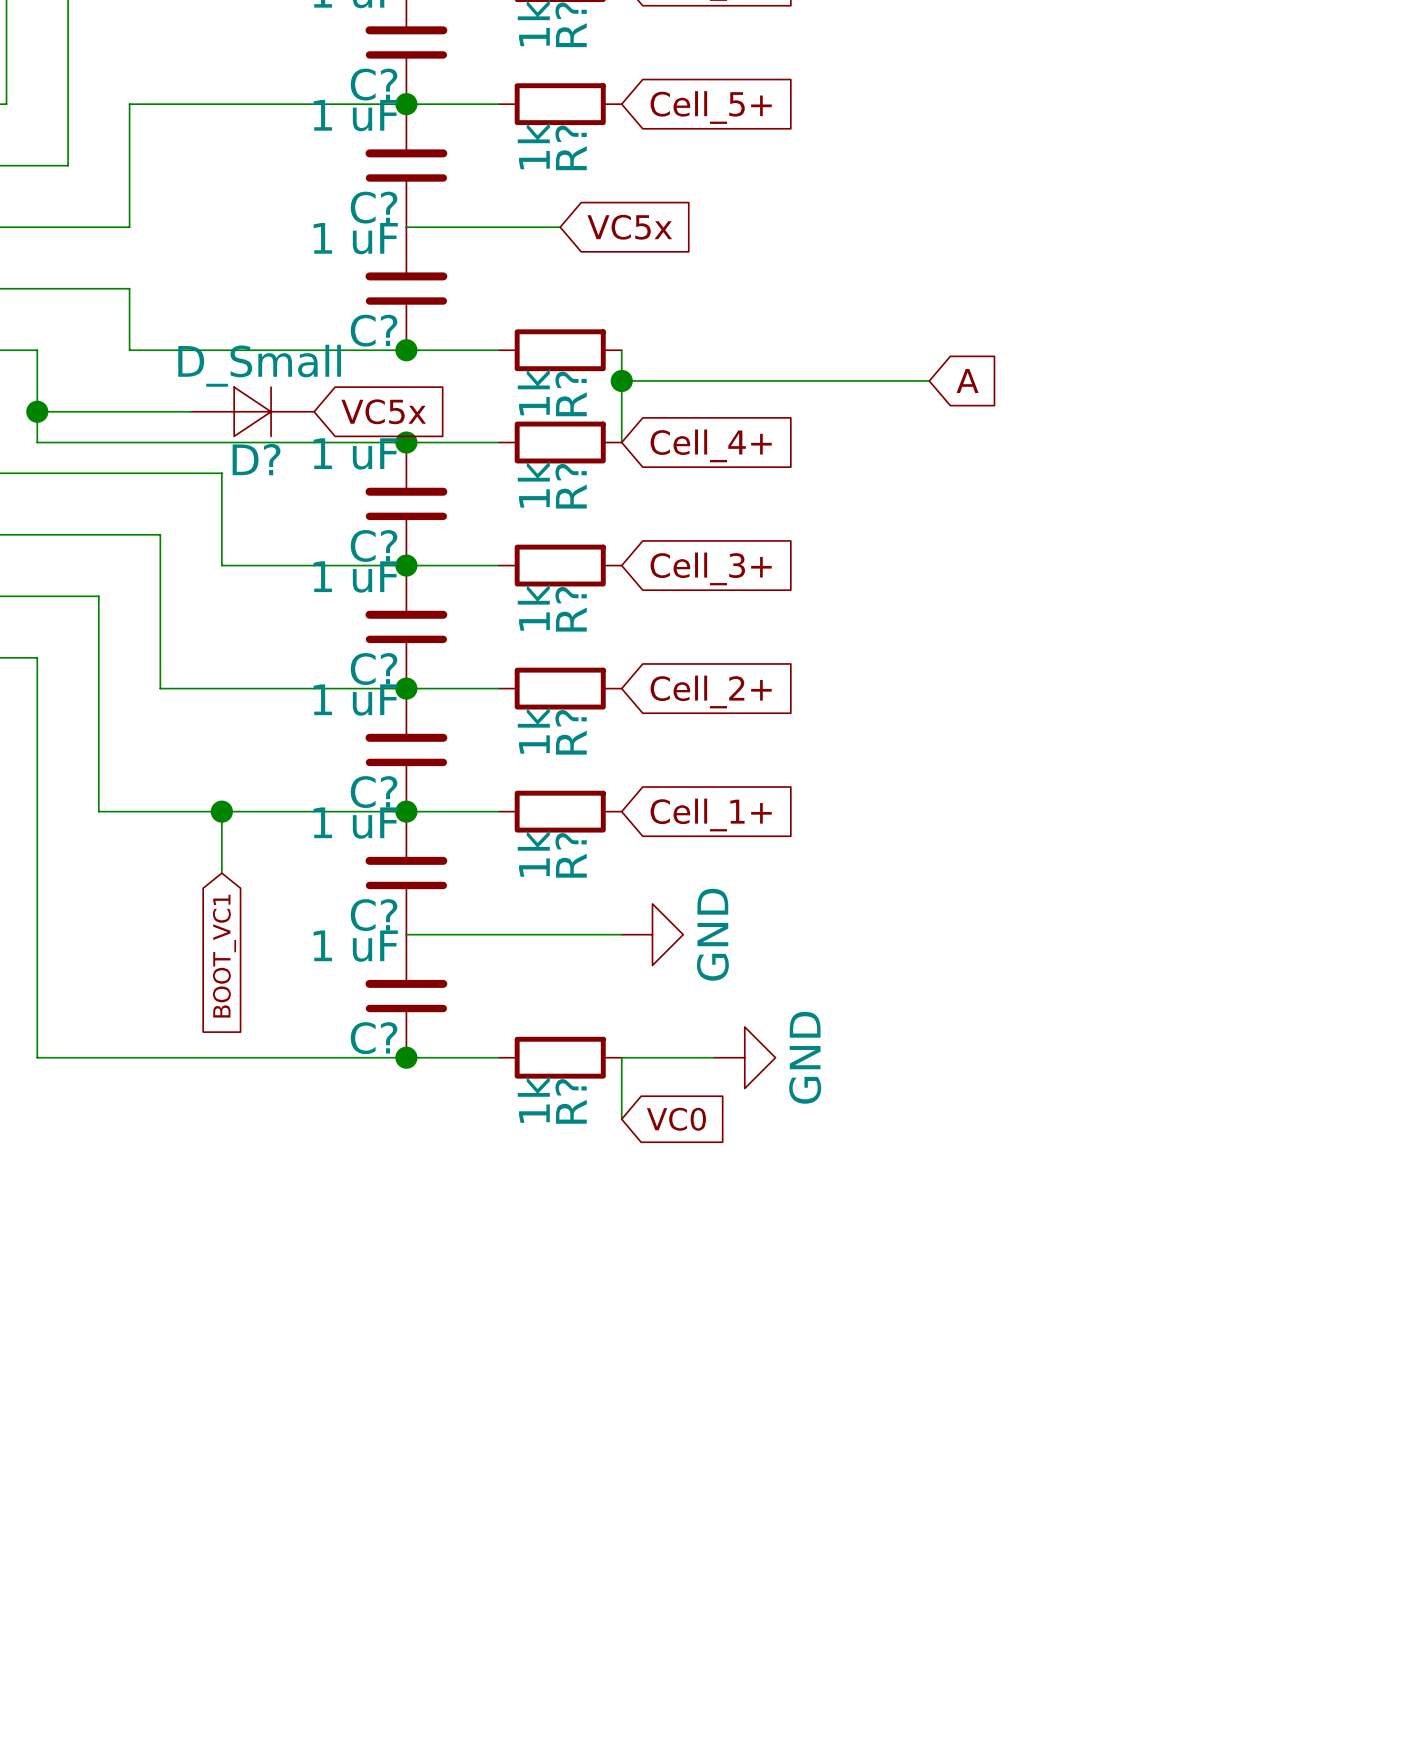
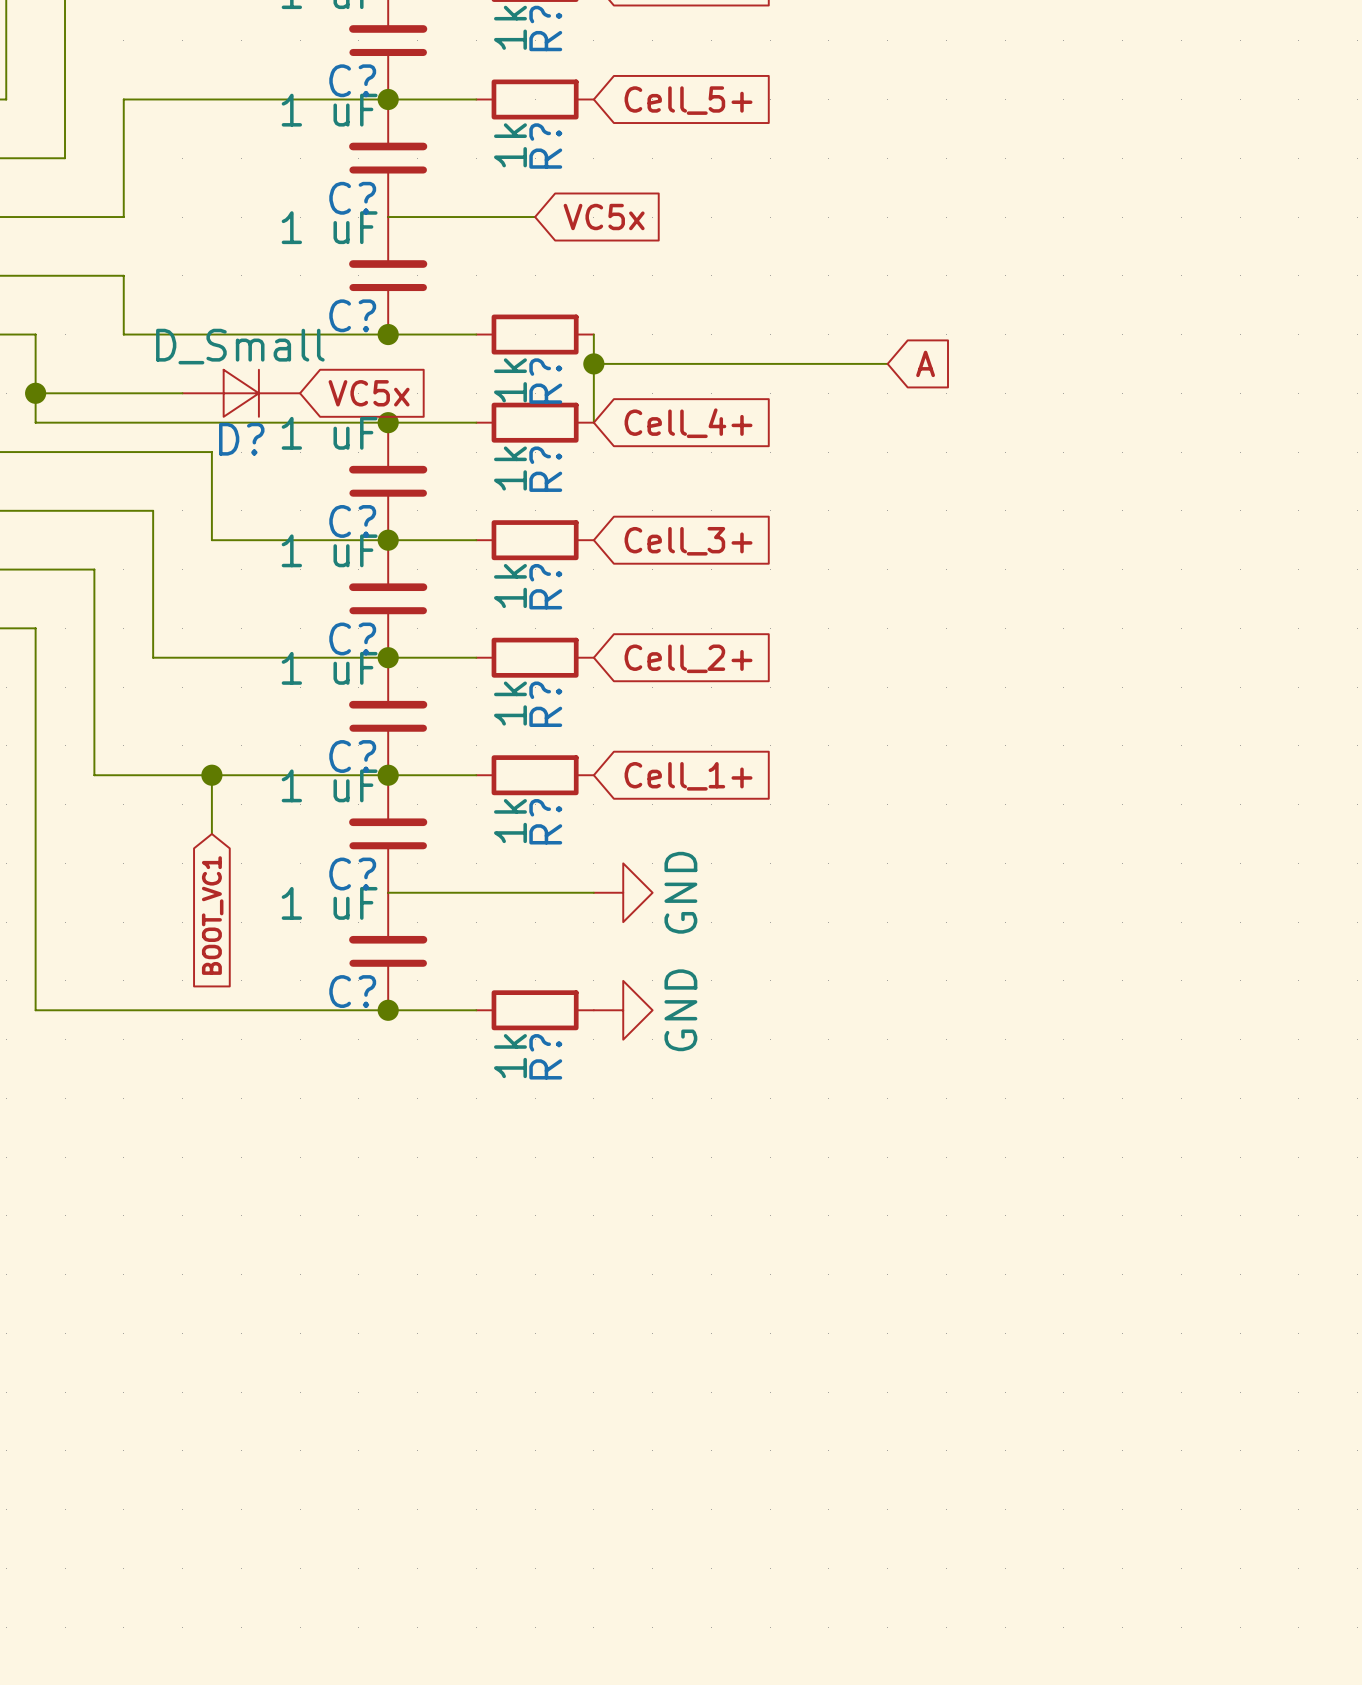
wire: (714, 1057) (621, 1057) (621, 1119) -> none
power symbol position: GND (744, 1057) -> GND (623, 1010)
global label: VC0 (676, 1119) -> none

